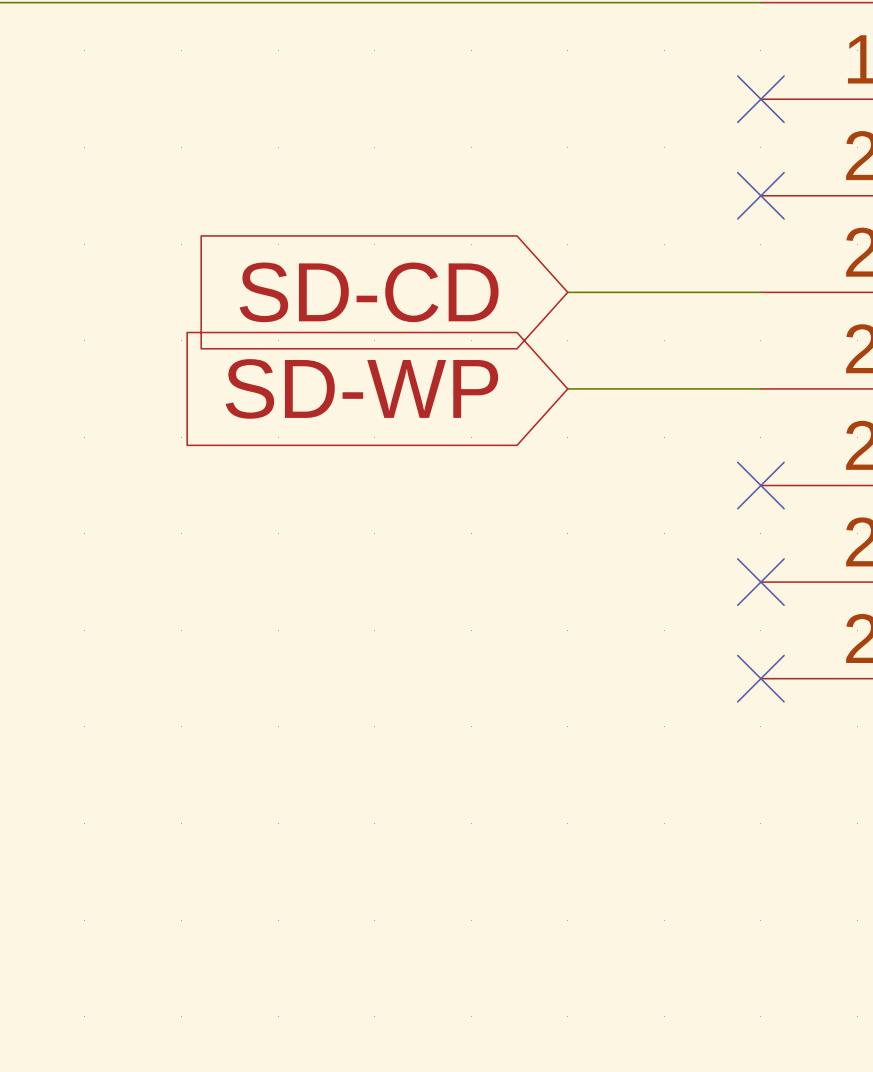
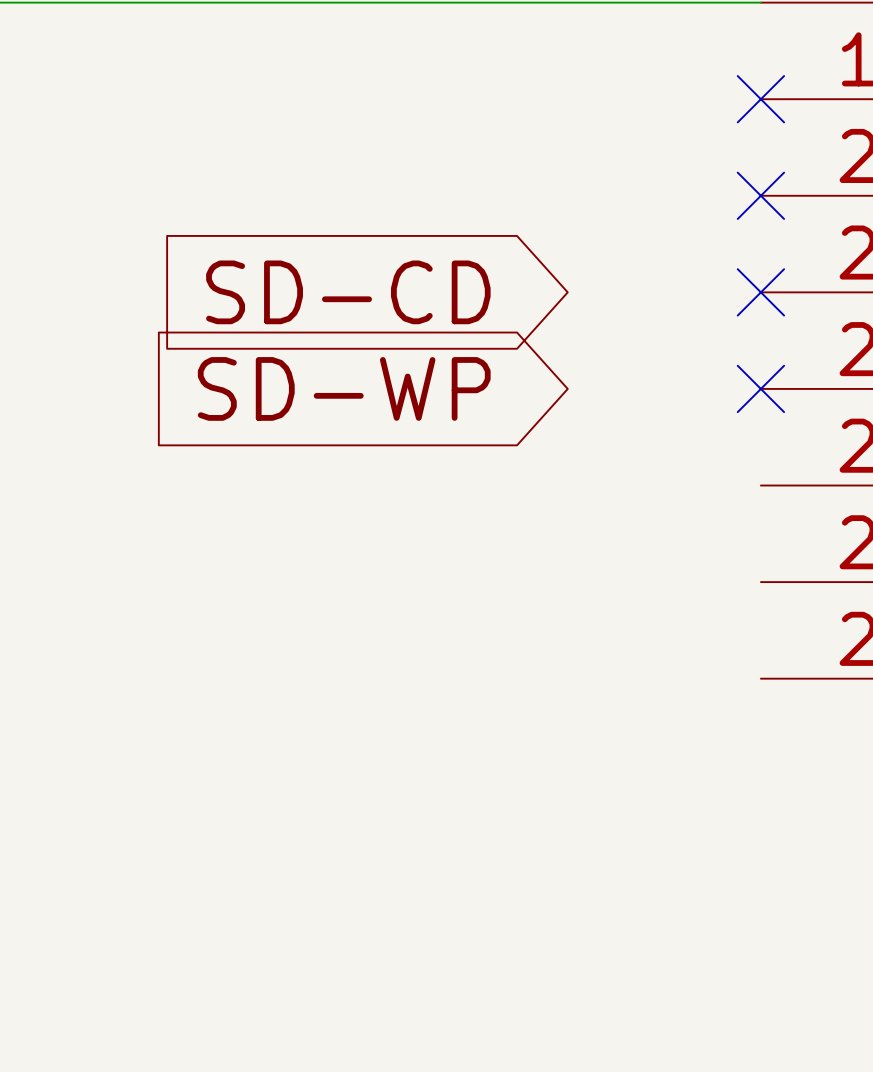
wire: (567, 292) (760, 292) -> none
no-connect mark: none -> (760, 292)
wire: (567, 388) (760, 388) -> none
no-connect mark: none -> (760, 388)
no-connect mark: (760, 485) -> none
no-connect mark: (760, 582) -> none
no-connect mark: (760, 678) -> none

